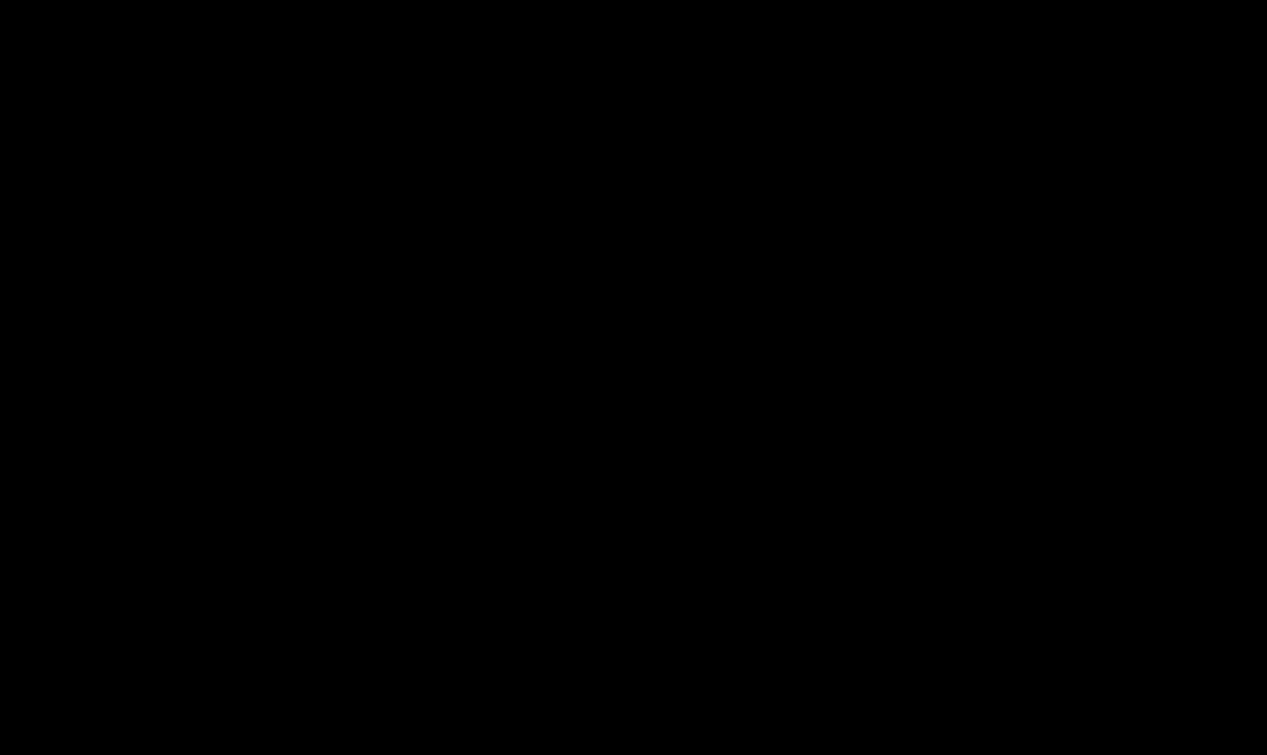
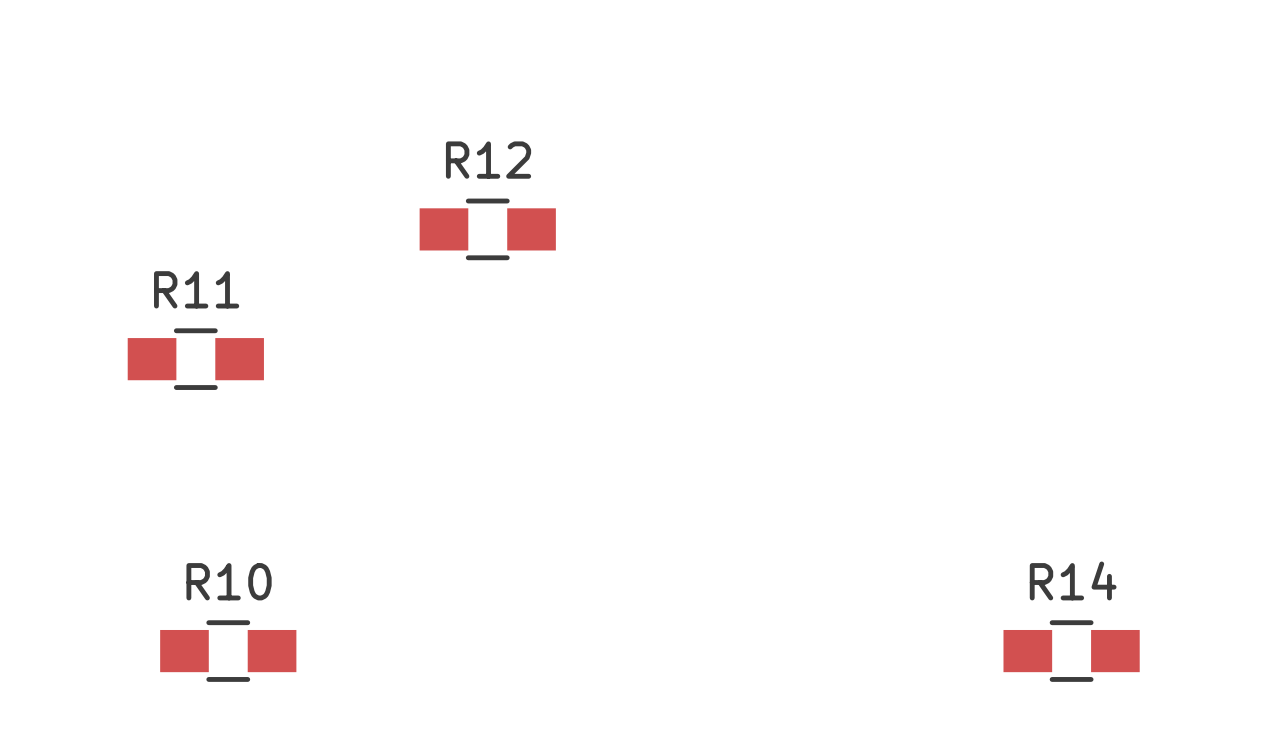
R12: none -> (487, 229)
R11: none -> (195, 359)
R10: none -> (228, 651)
R14: none -> (1071, 651)

